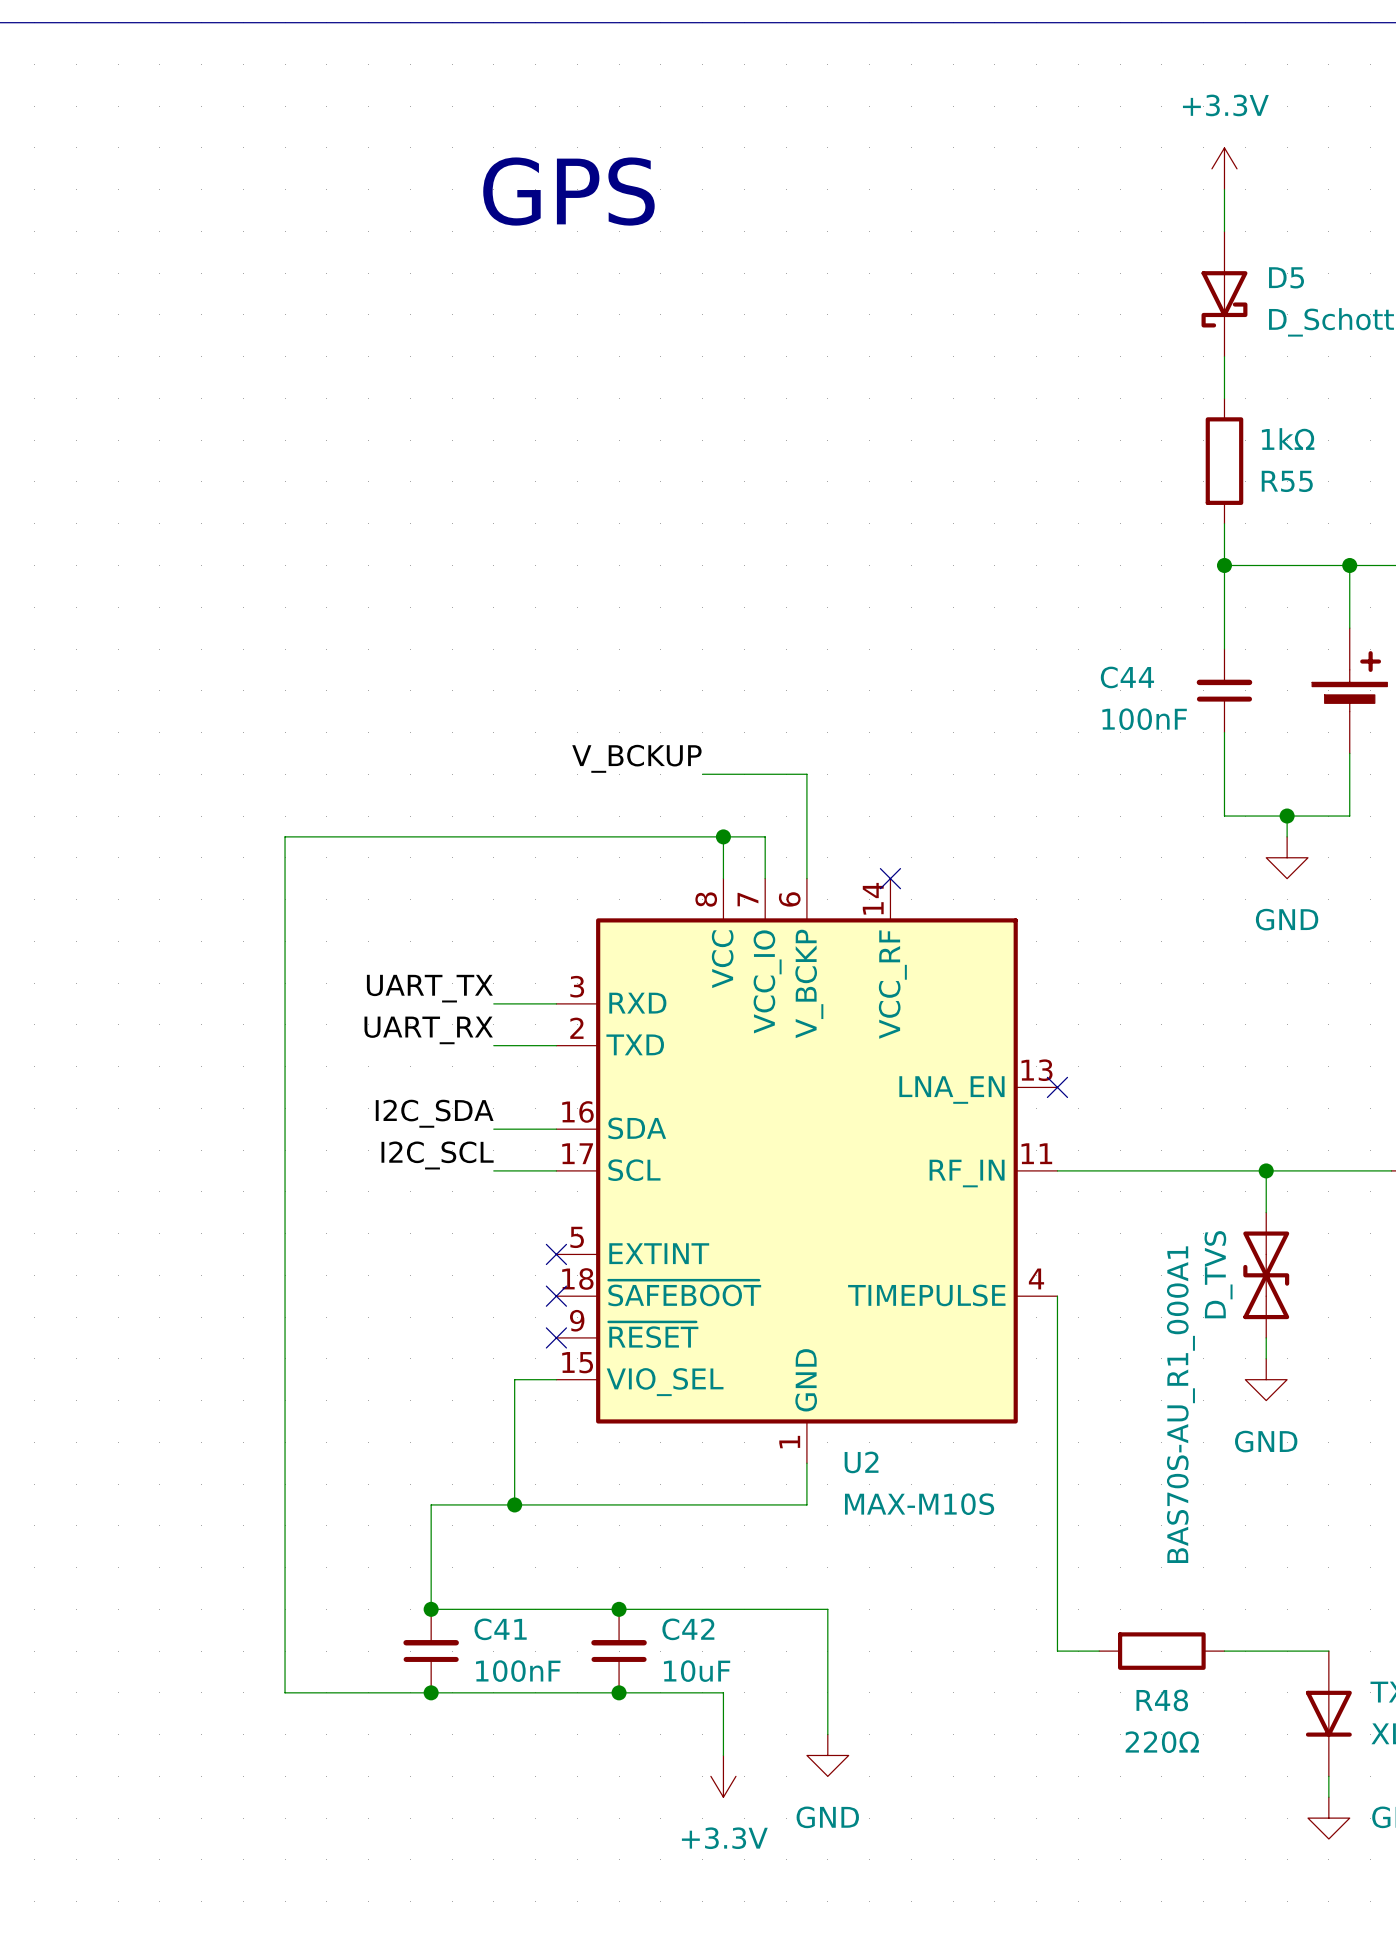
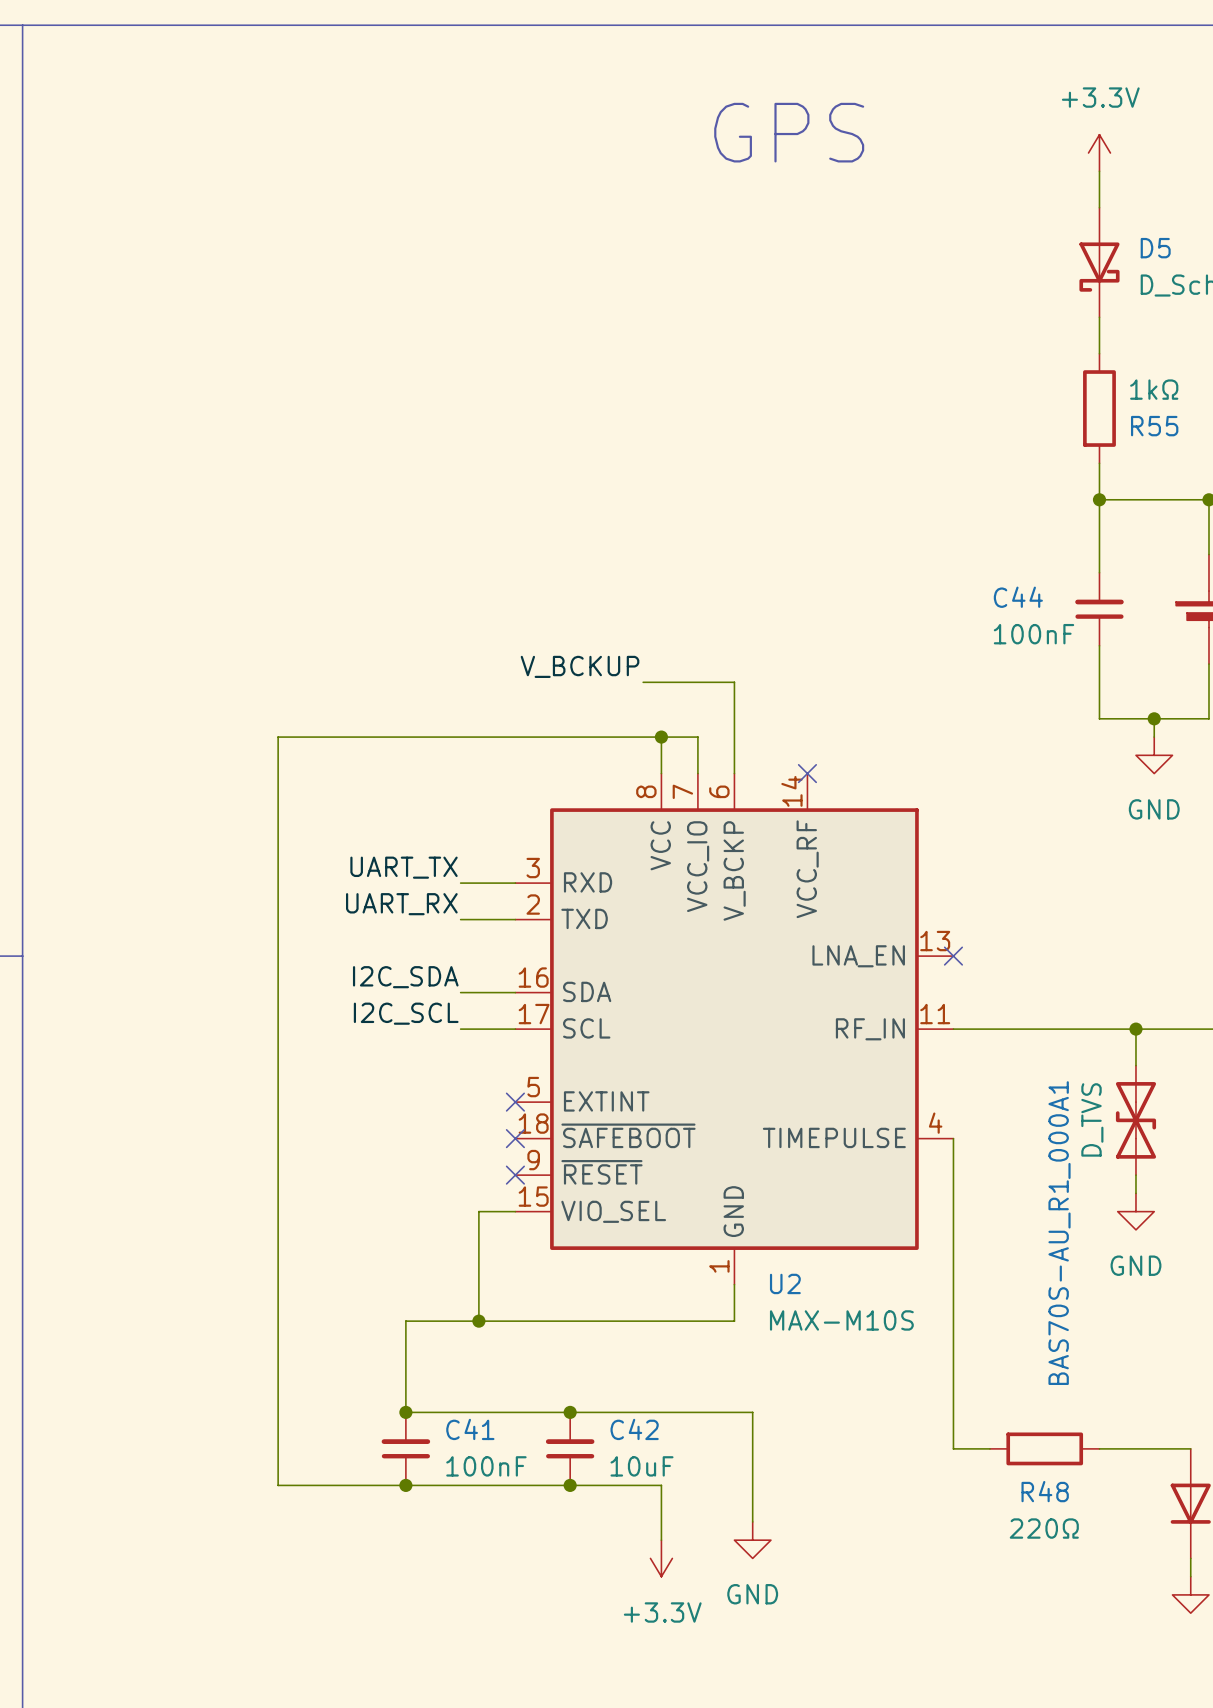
text position: GPS (568, 191) -> GPS (789, 132)

